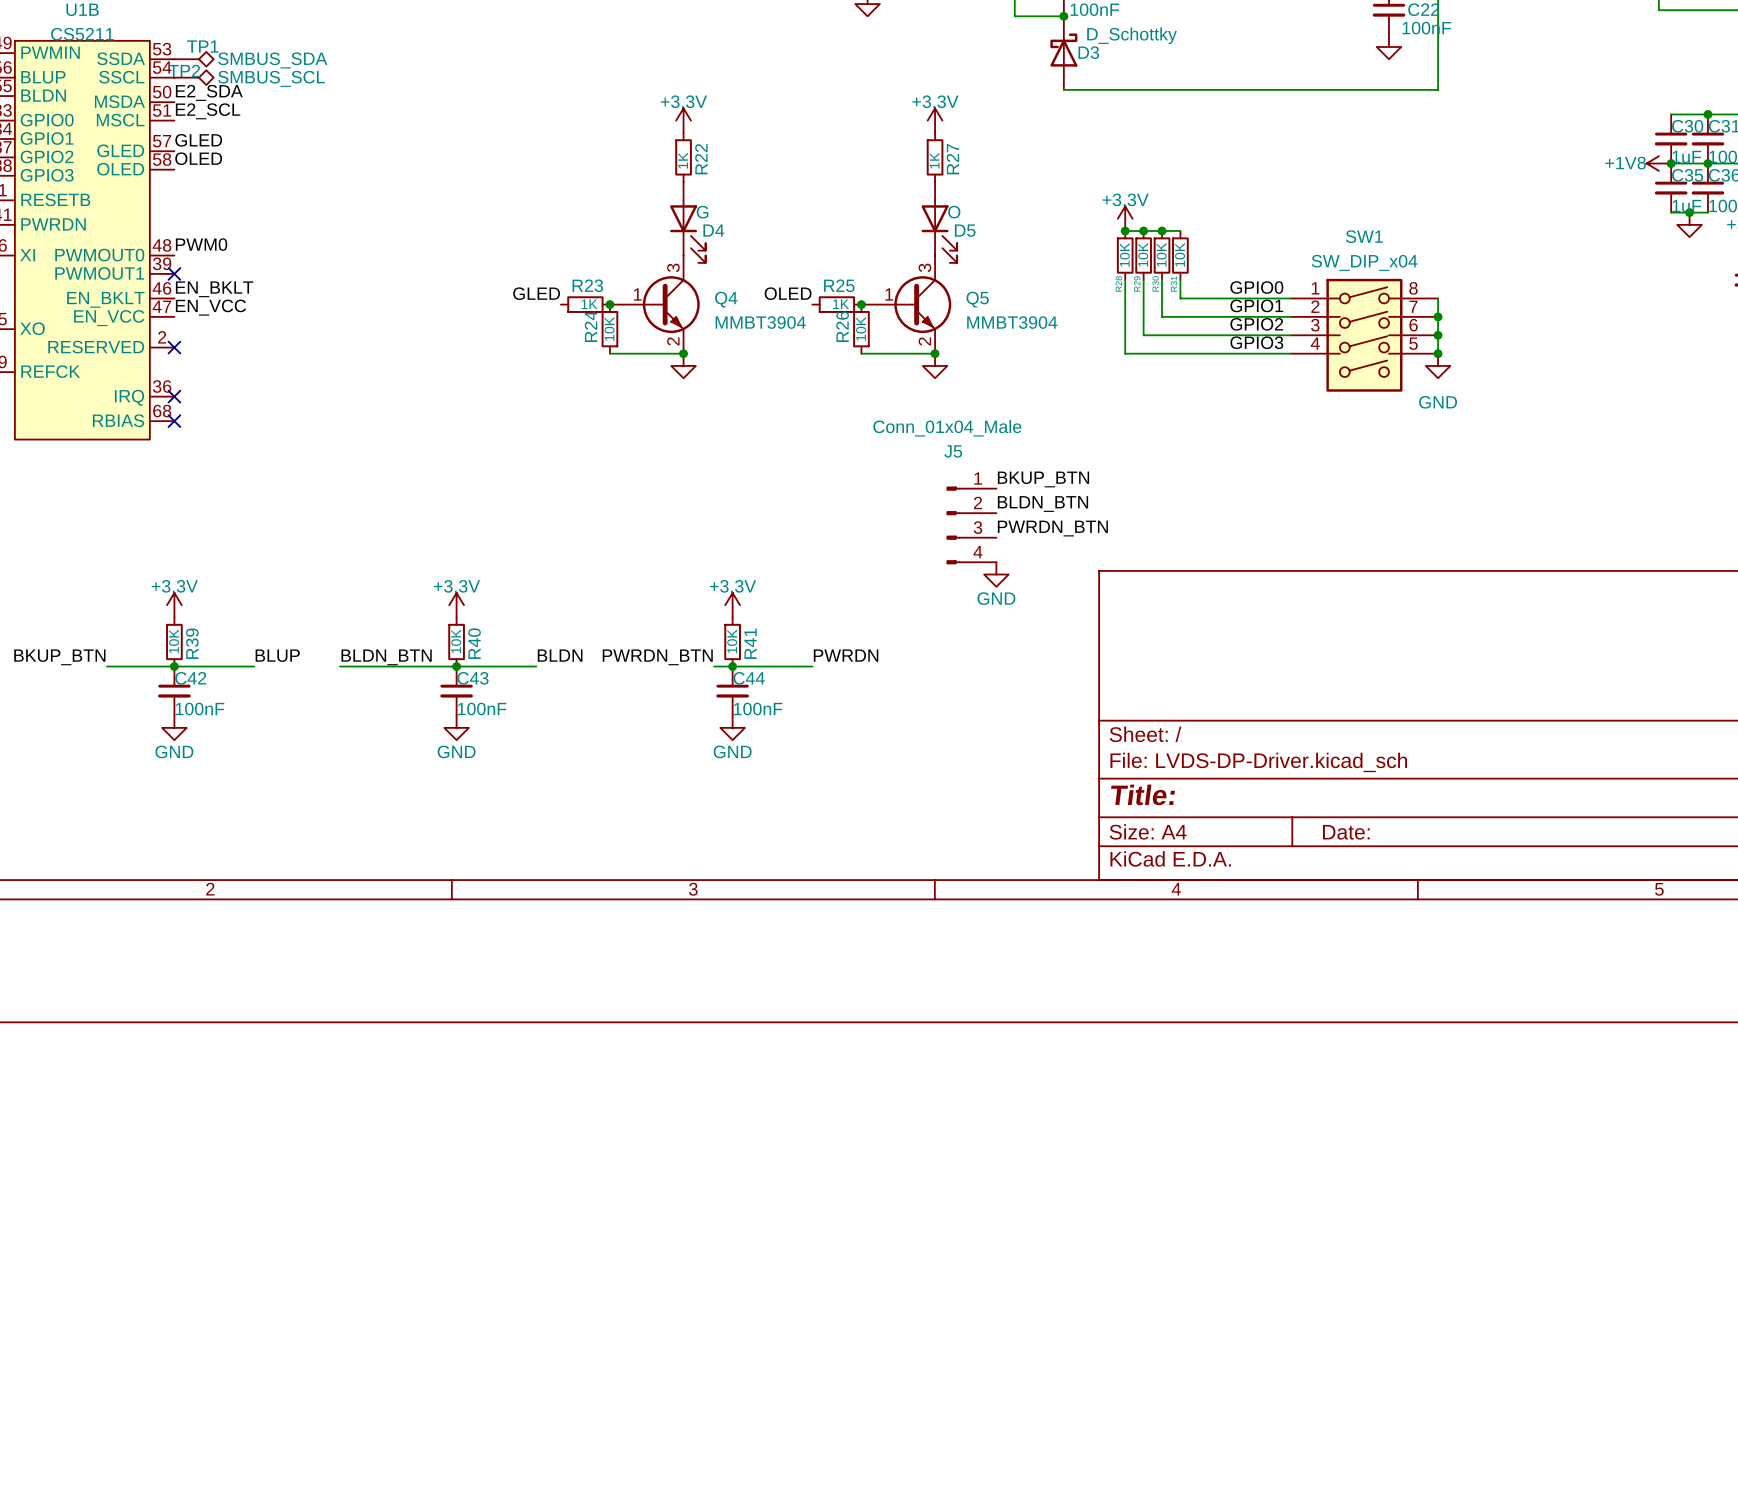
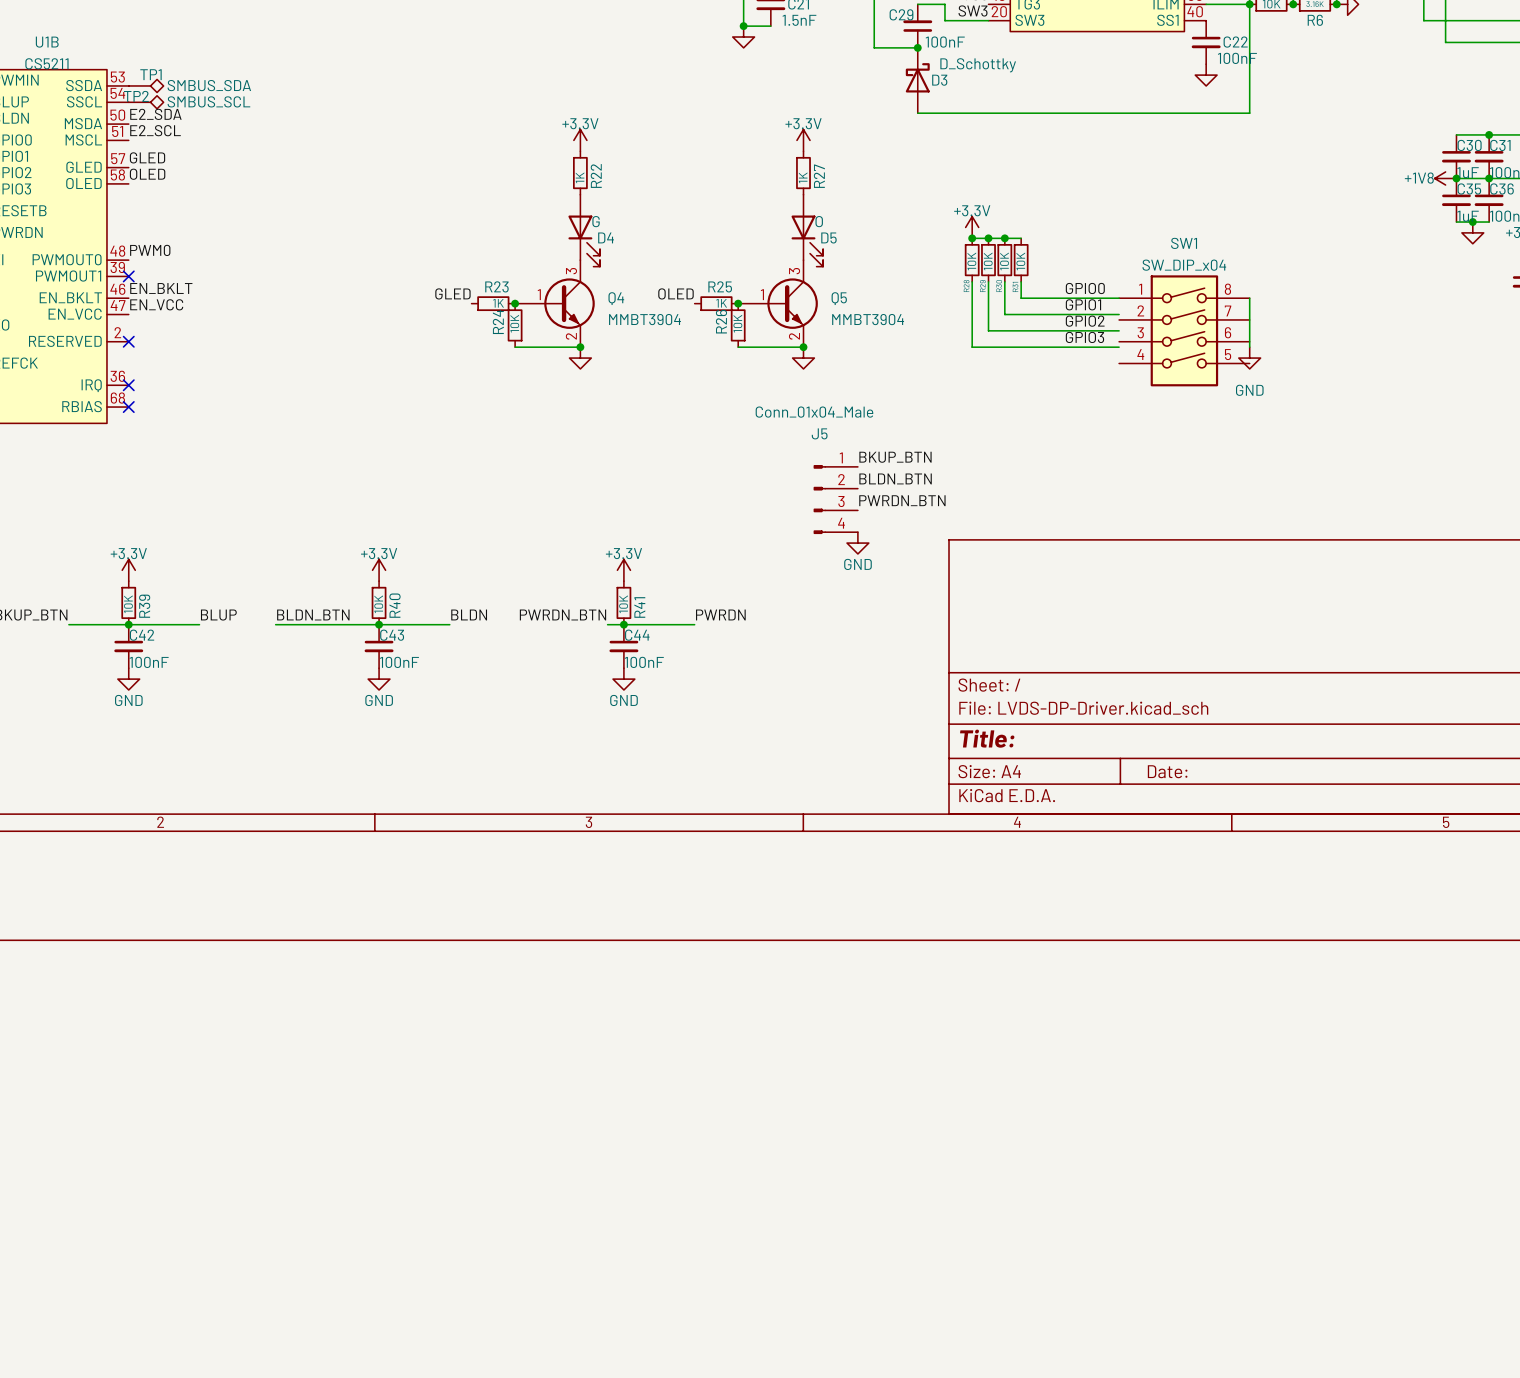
SW1 symbol: [1290, 278, 1439, 392] -> [1119, 275, 1250, 387]
junction: (1438, 316) -> none
junction: (1438, 335) -> none
junction: (1438, 353) -> none

